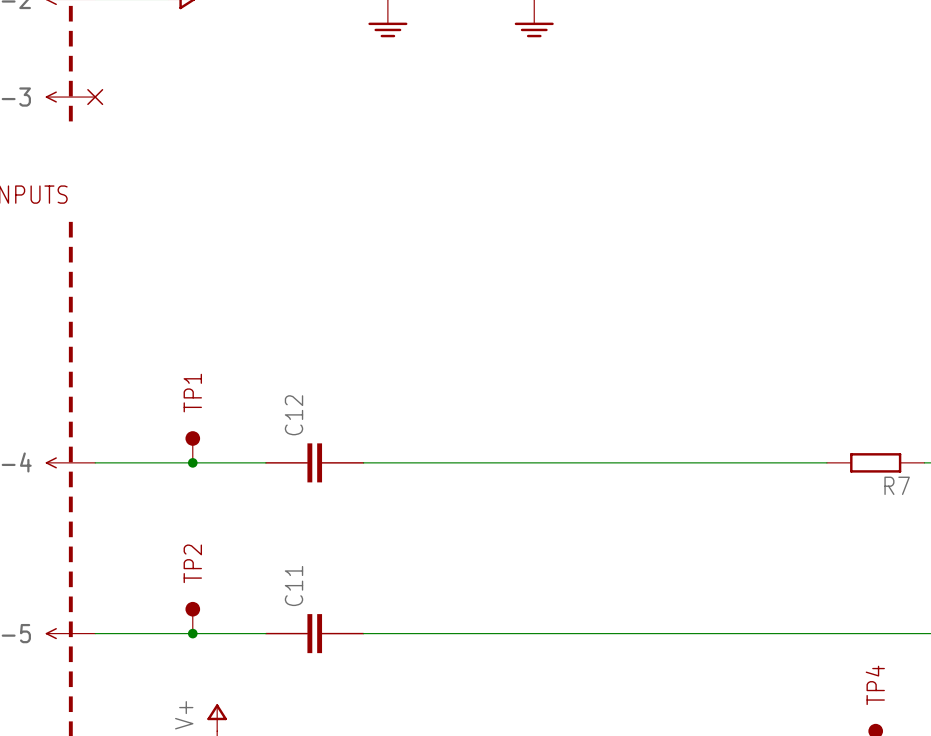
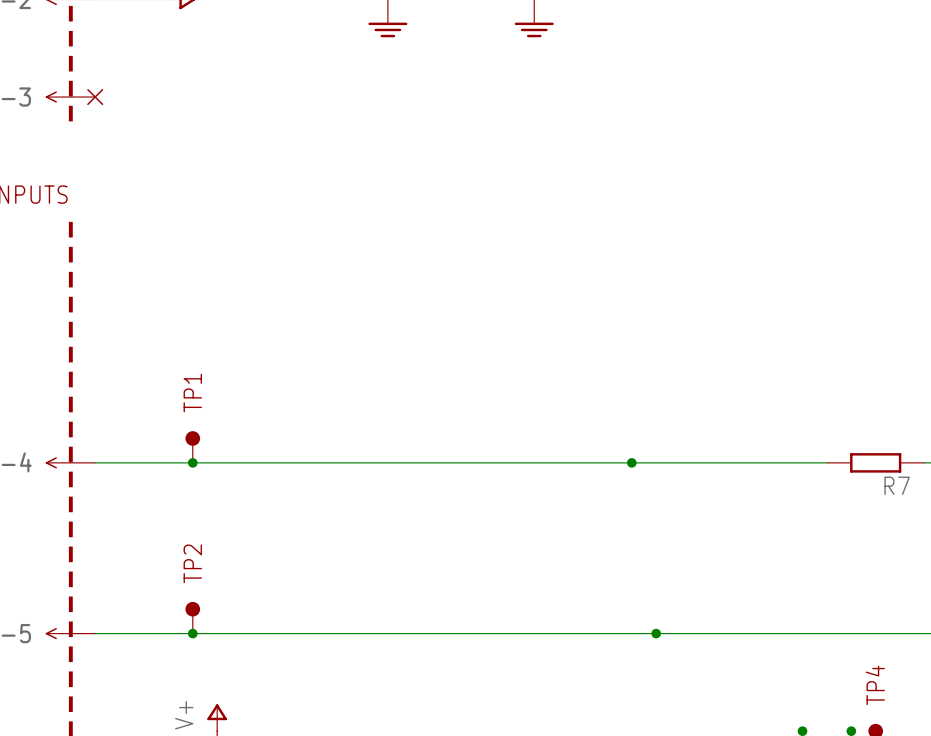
C12: (314, 462) -> none
junction: none -> (631, 462)
C11: (314, 633) -> none
junction: none -> (656, 633)
junction: none -> (802, 731)
junction: none -> (851, 731)

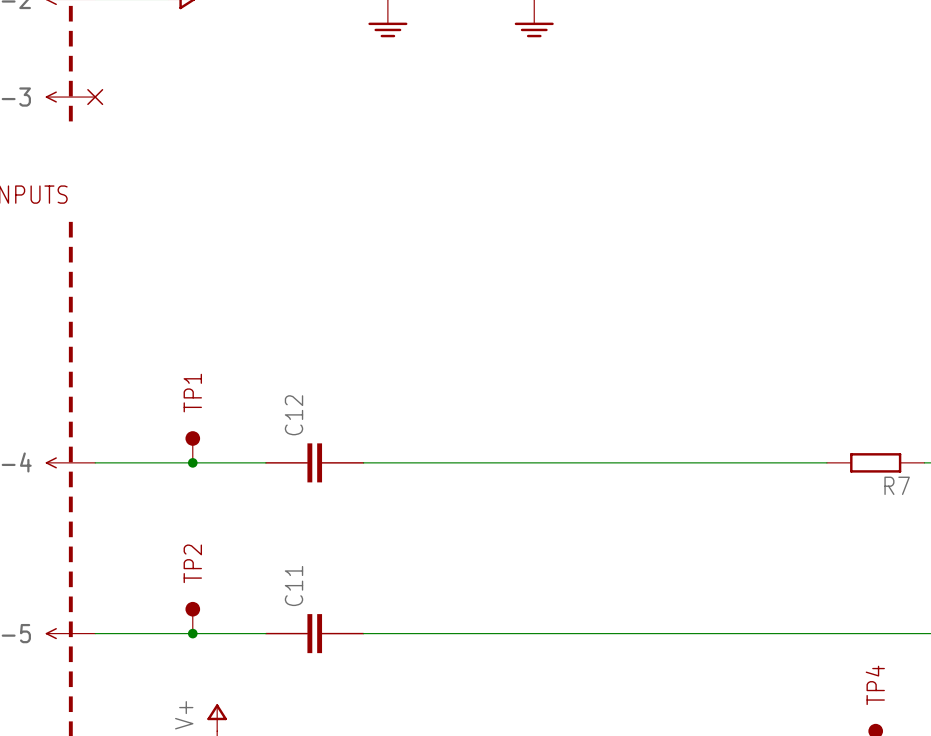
C12: none -> (314, 462)
junction: (631, 462) -> none
C11: none -> (314, 633)
junction: (656, 633) -> none
junction: (802, 731) -> none
junction: (851, 731) -> none

